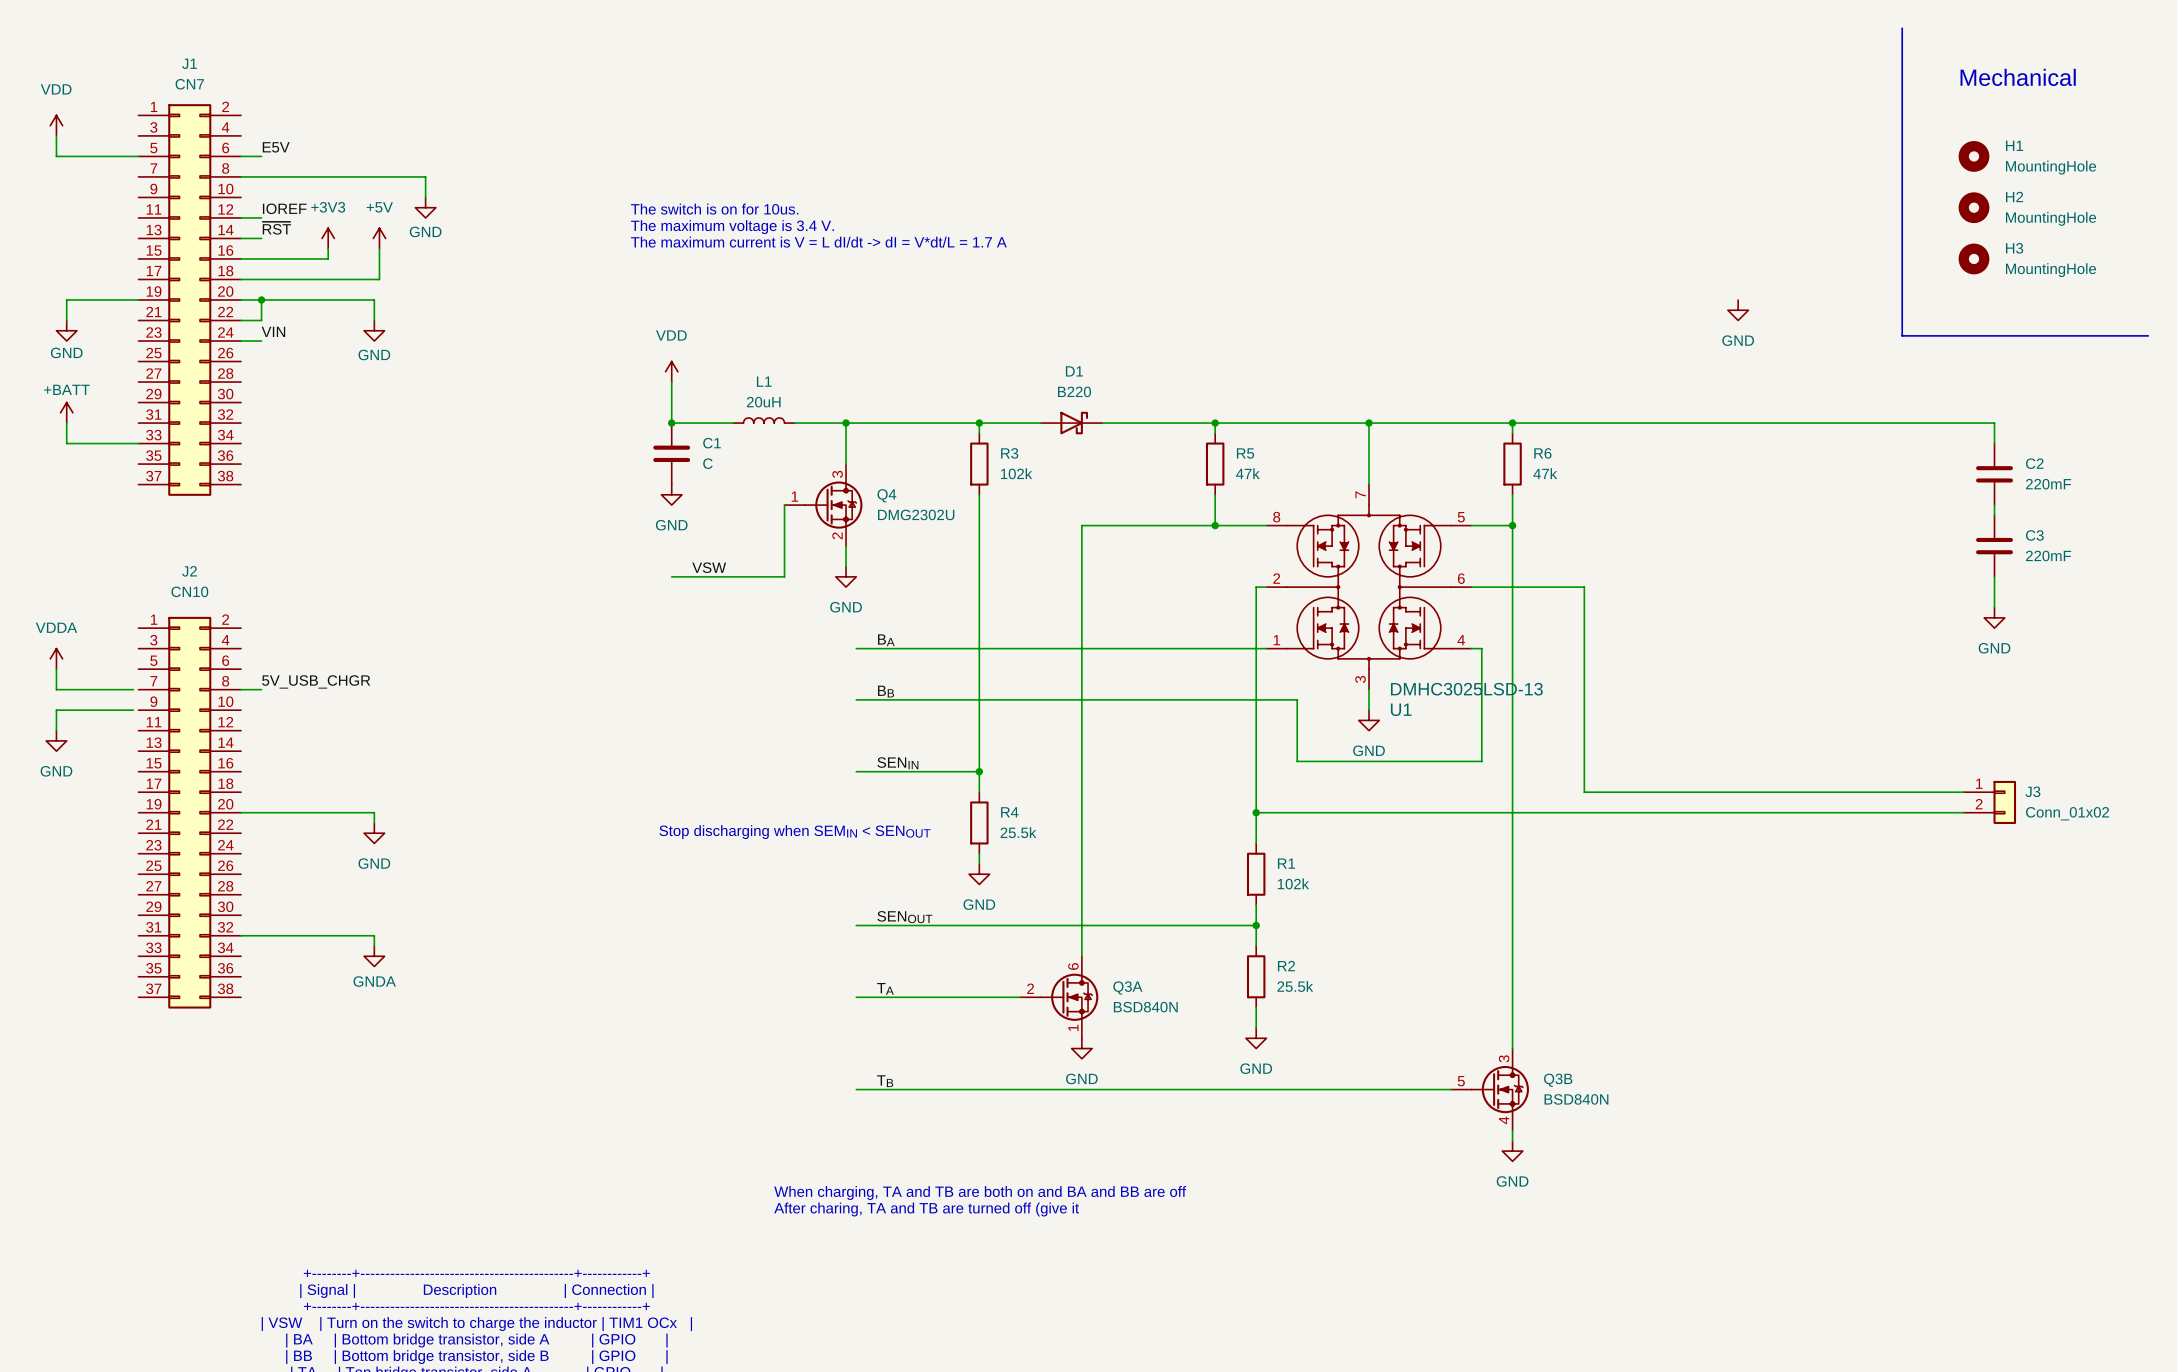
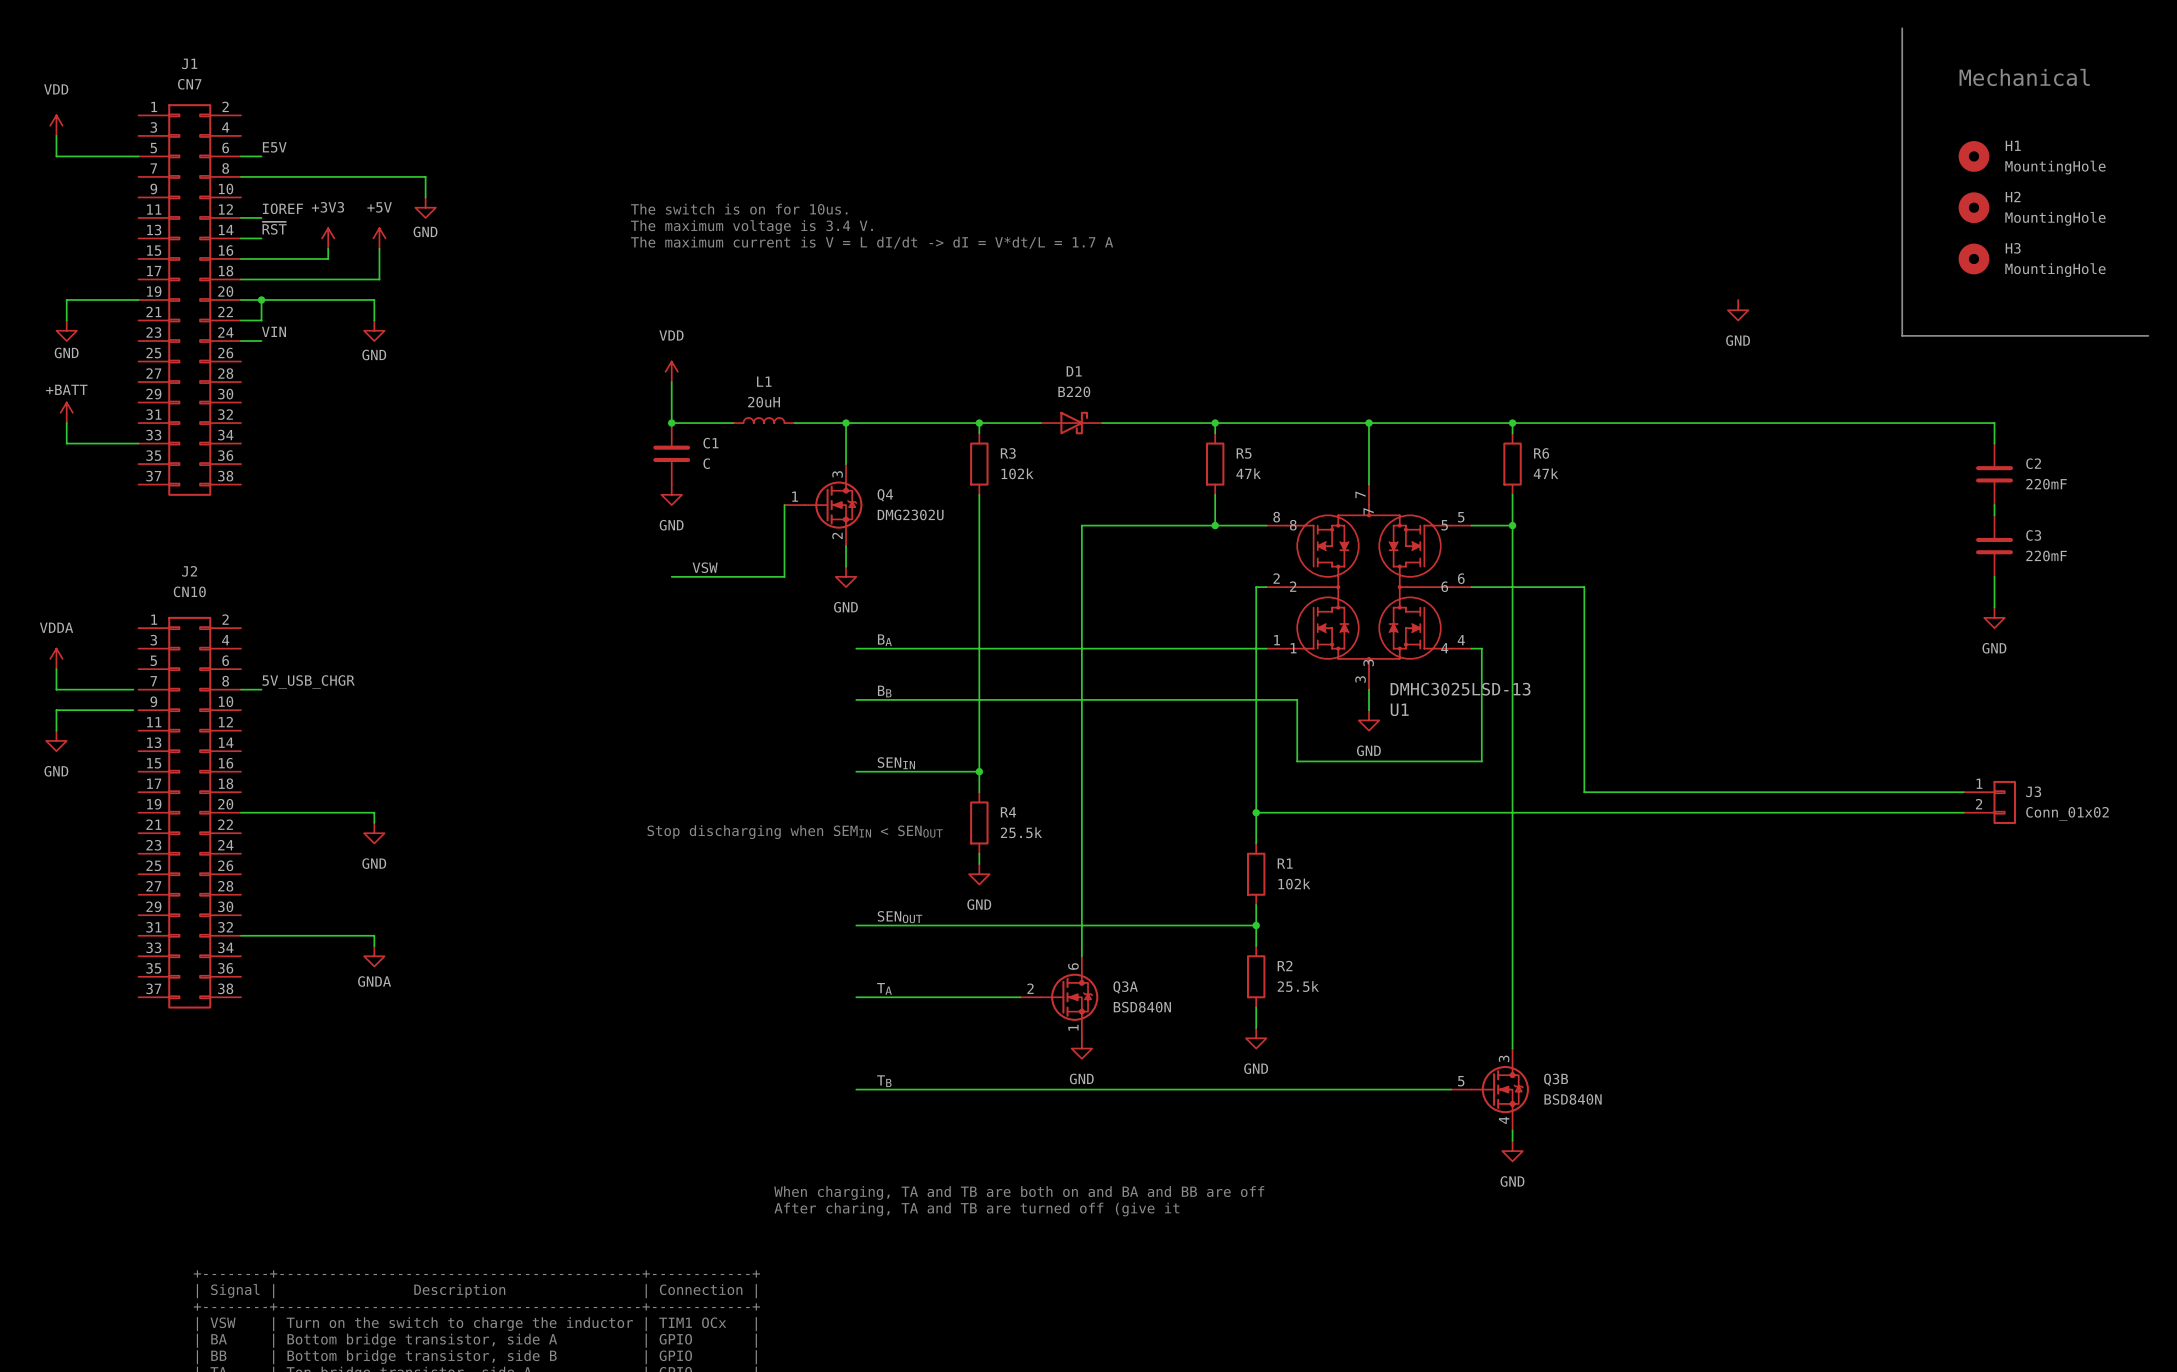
U1 pin name: none -> 7 (1368, 511)
U1 pin name: none -> 8 (1293, 525)
U1 pin name: none -> 5 (1444, 525)
U1 pin name: none -> 2 (1293, 586)
U1 pin name: none -> 6 (1444, 586)
U1 pin name: none -> 1 (1293, 648)
U1 pin name: none -> 4 (1444, 648)
U1 pin name: none -> 3 (1368, 662)

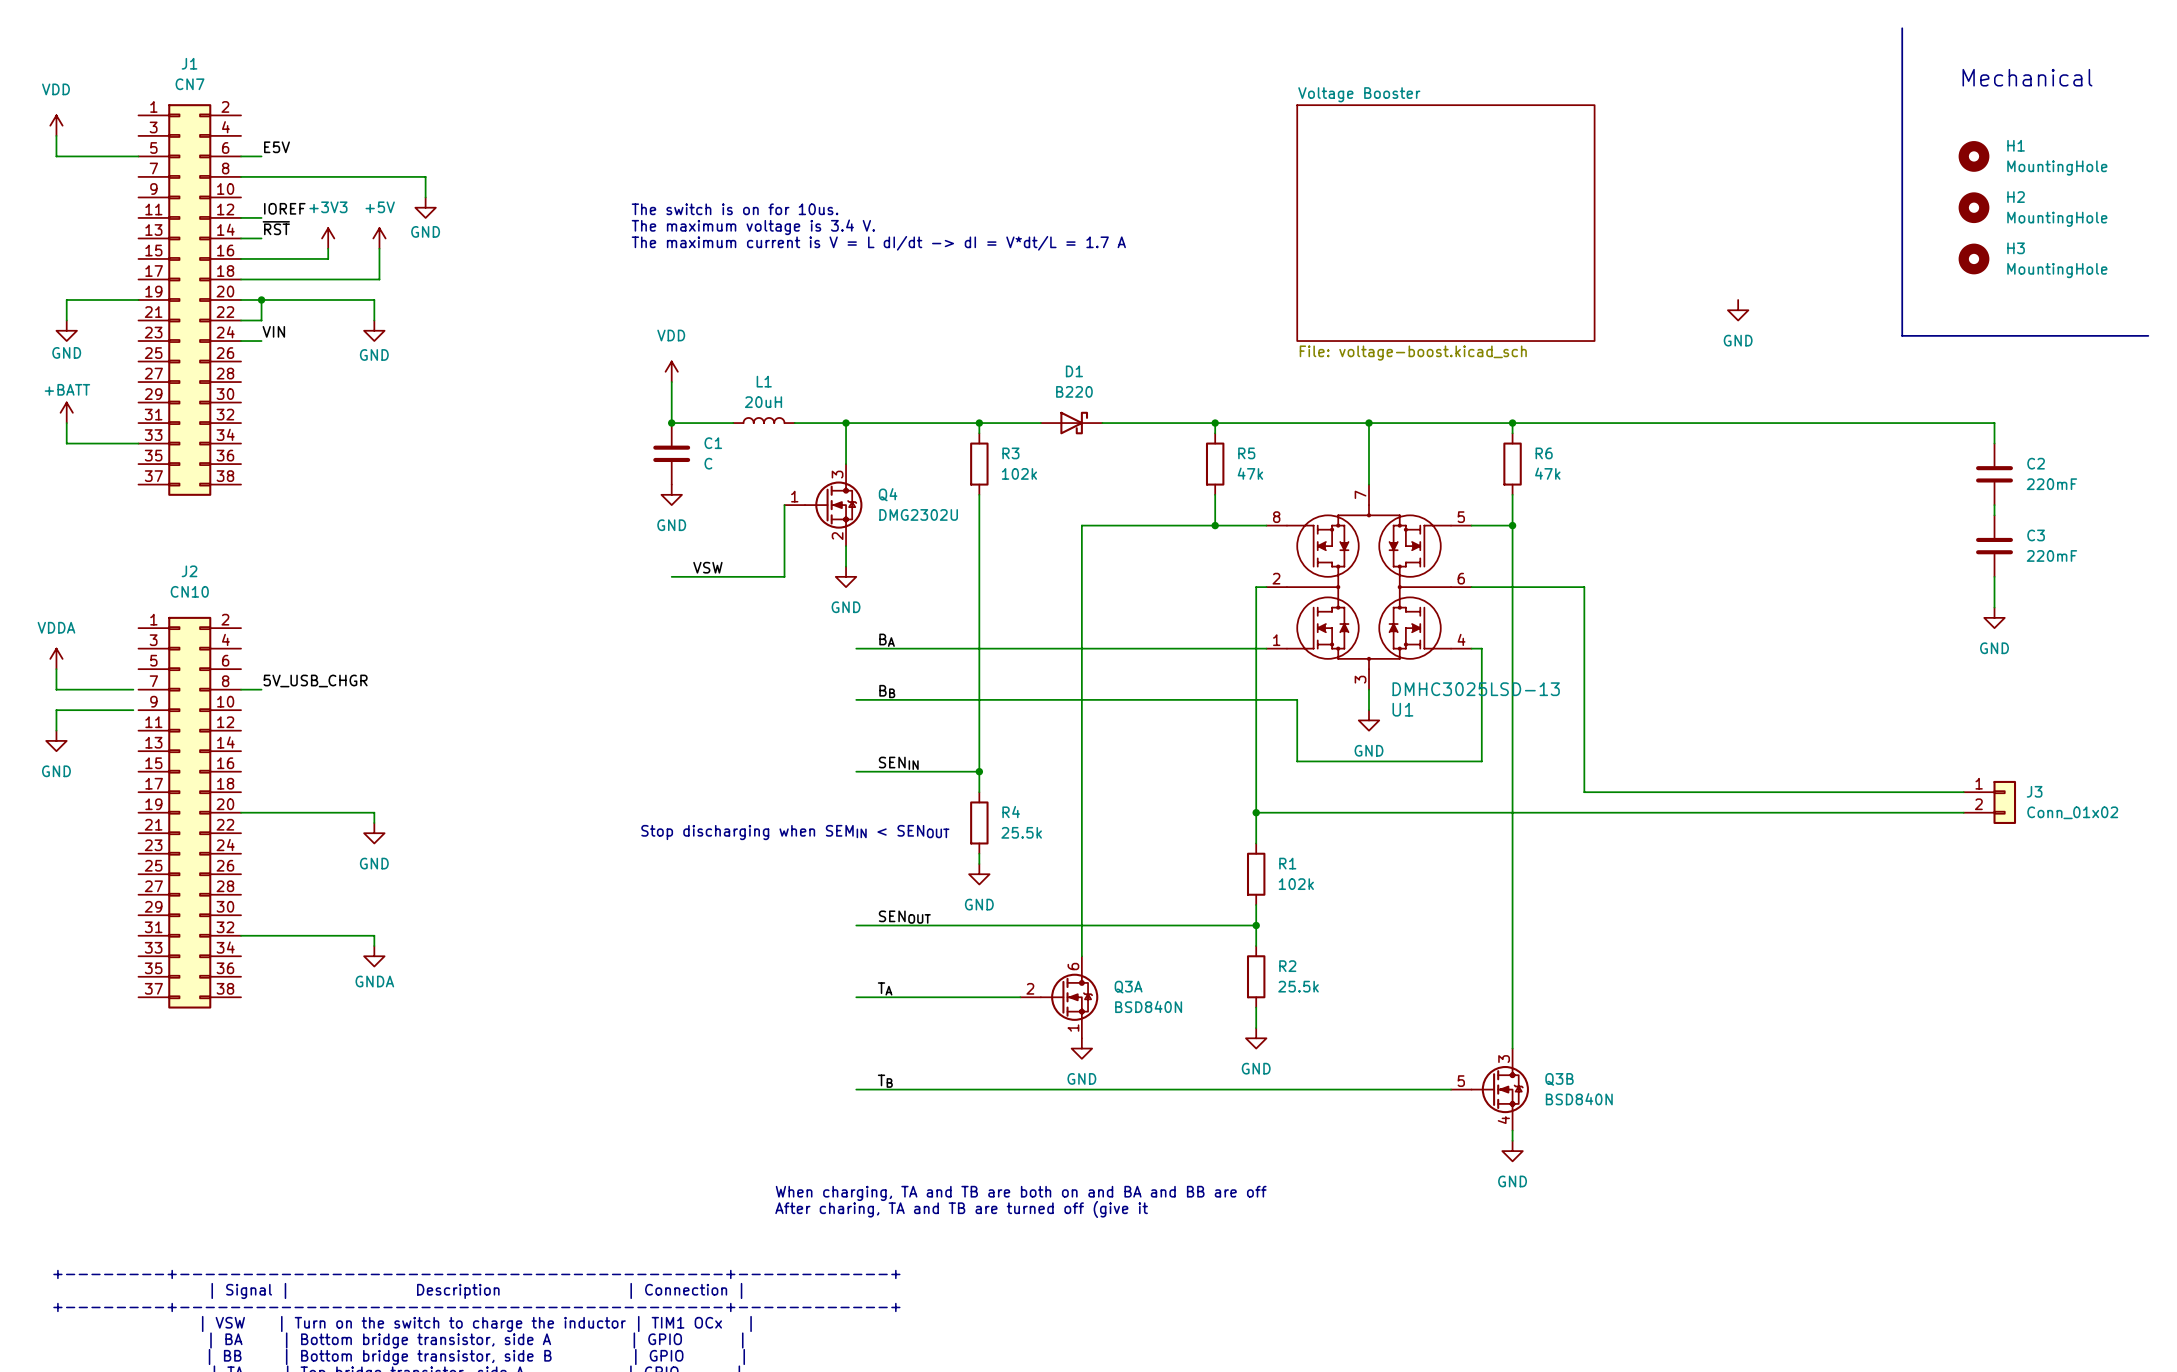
sheet Voltage Booster: none -> File: voltage-boost.kicad_sch (1445, 223)
U1 pin name: 7 (1368, 511) -> none
U1 pin name: 8 (1293, 525) -> none
U1 pin name: 5 (1444, 525) -> none
U1 pin name: 2 (1293, 586) -> none
U1 pin name: 6 (1444, 586) -> none
U1 pin name: 1 (1293, 648) -> none
U1 pin name: 4 (1444, 648) -> none
U1 pin name: 3 (1368, 662) -> none

